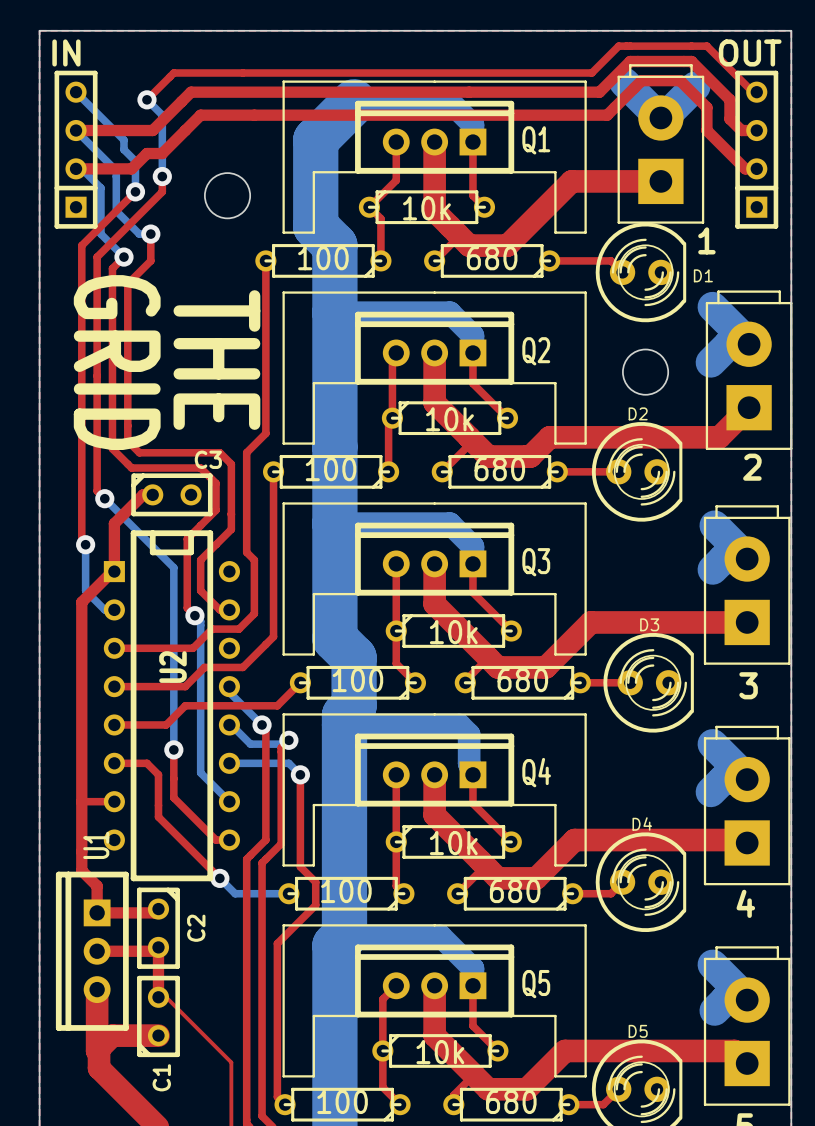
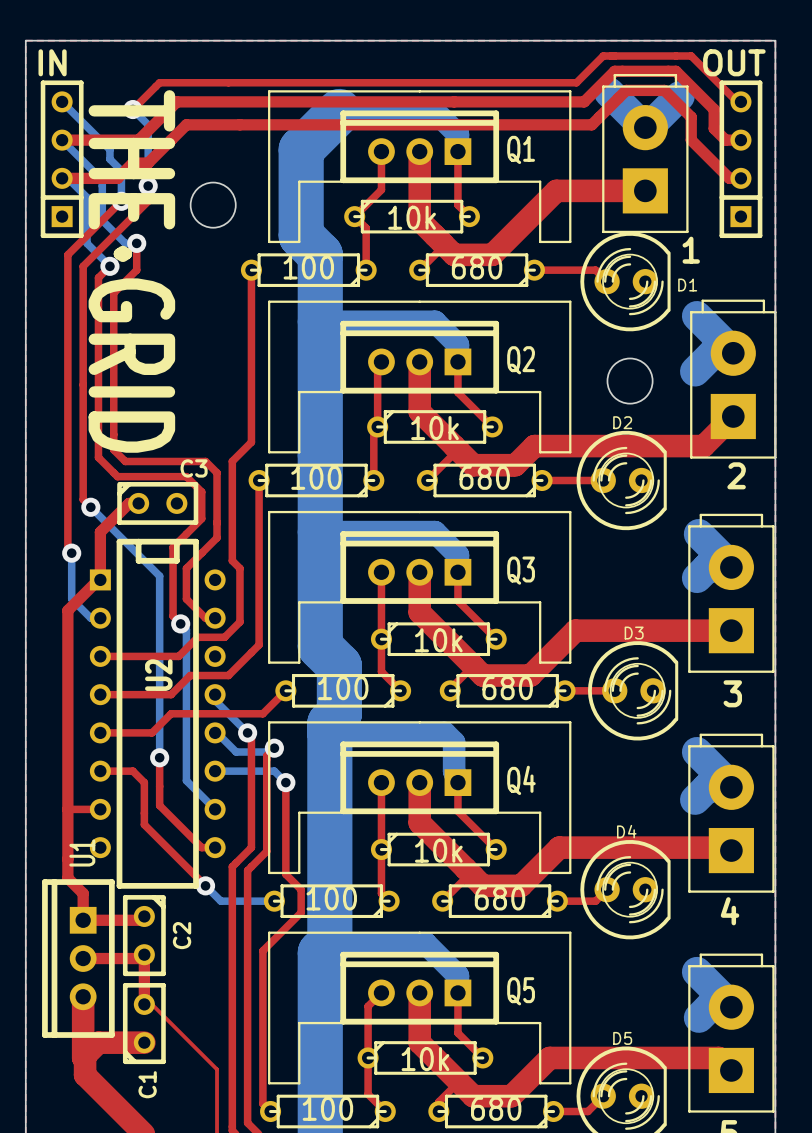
text: THE (216, 360) -> none
text: GRID (117, 362) -> THE·GRID (131, 271)

